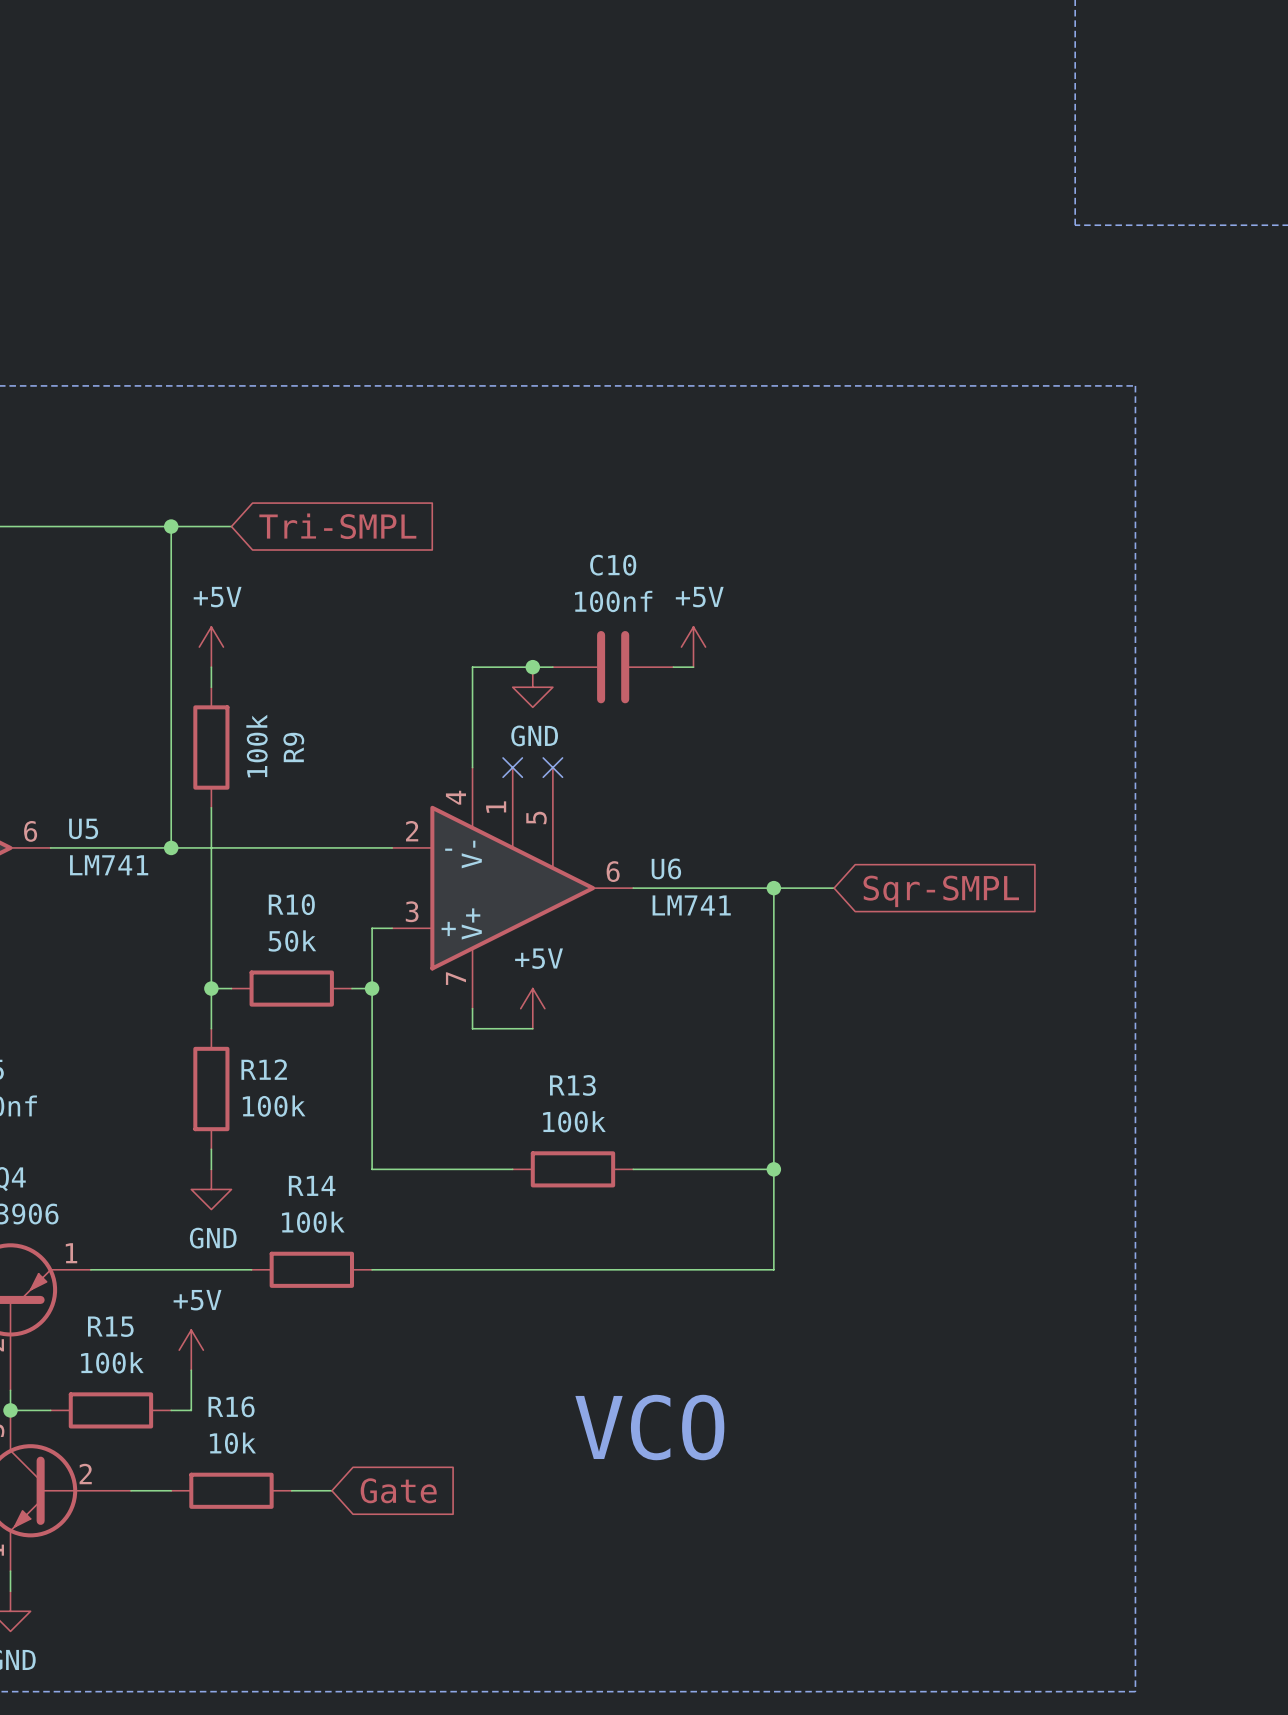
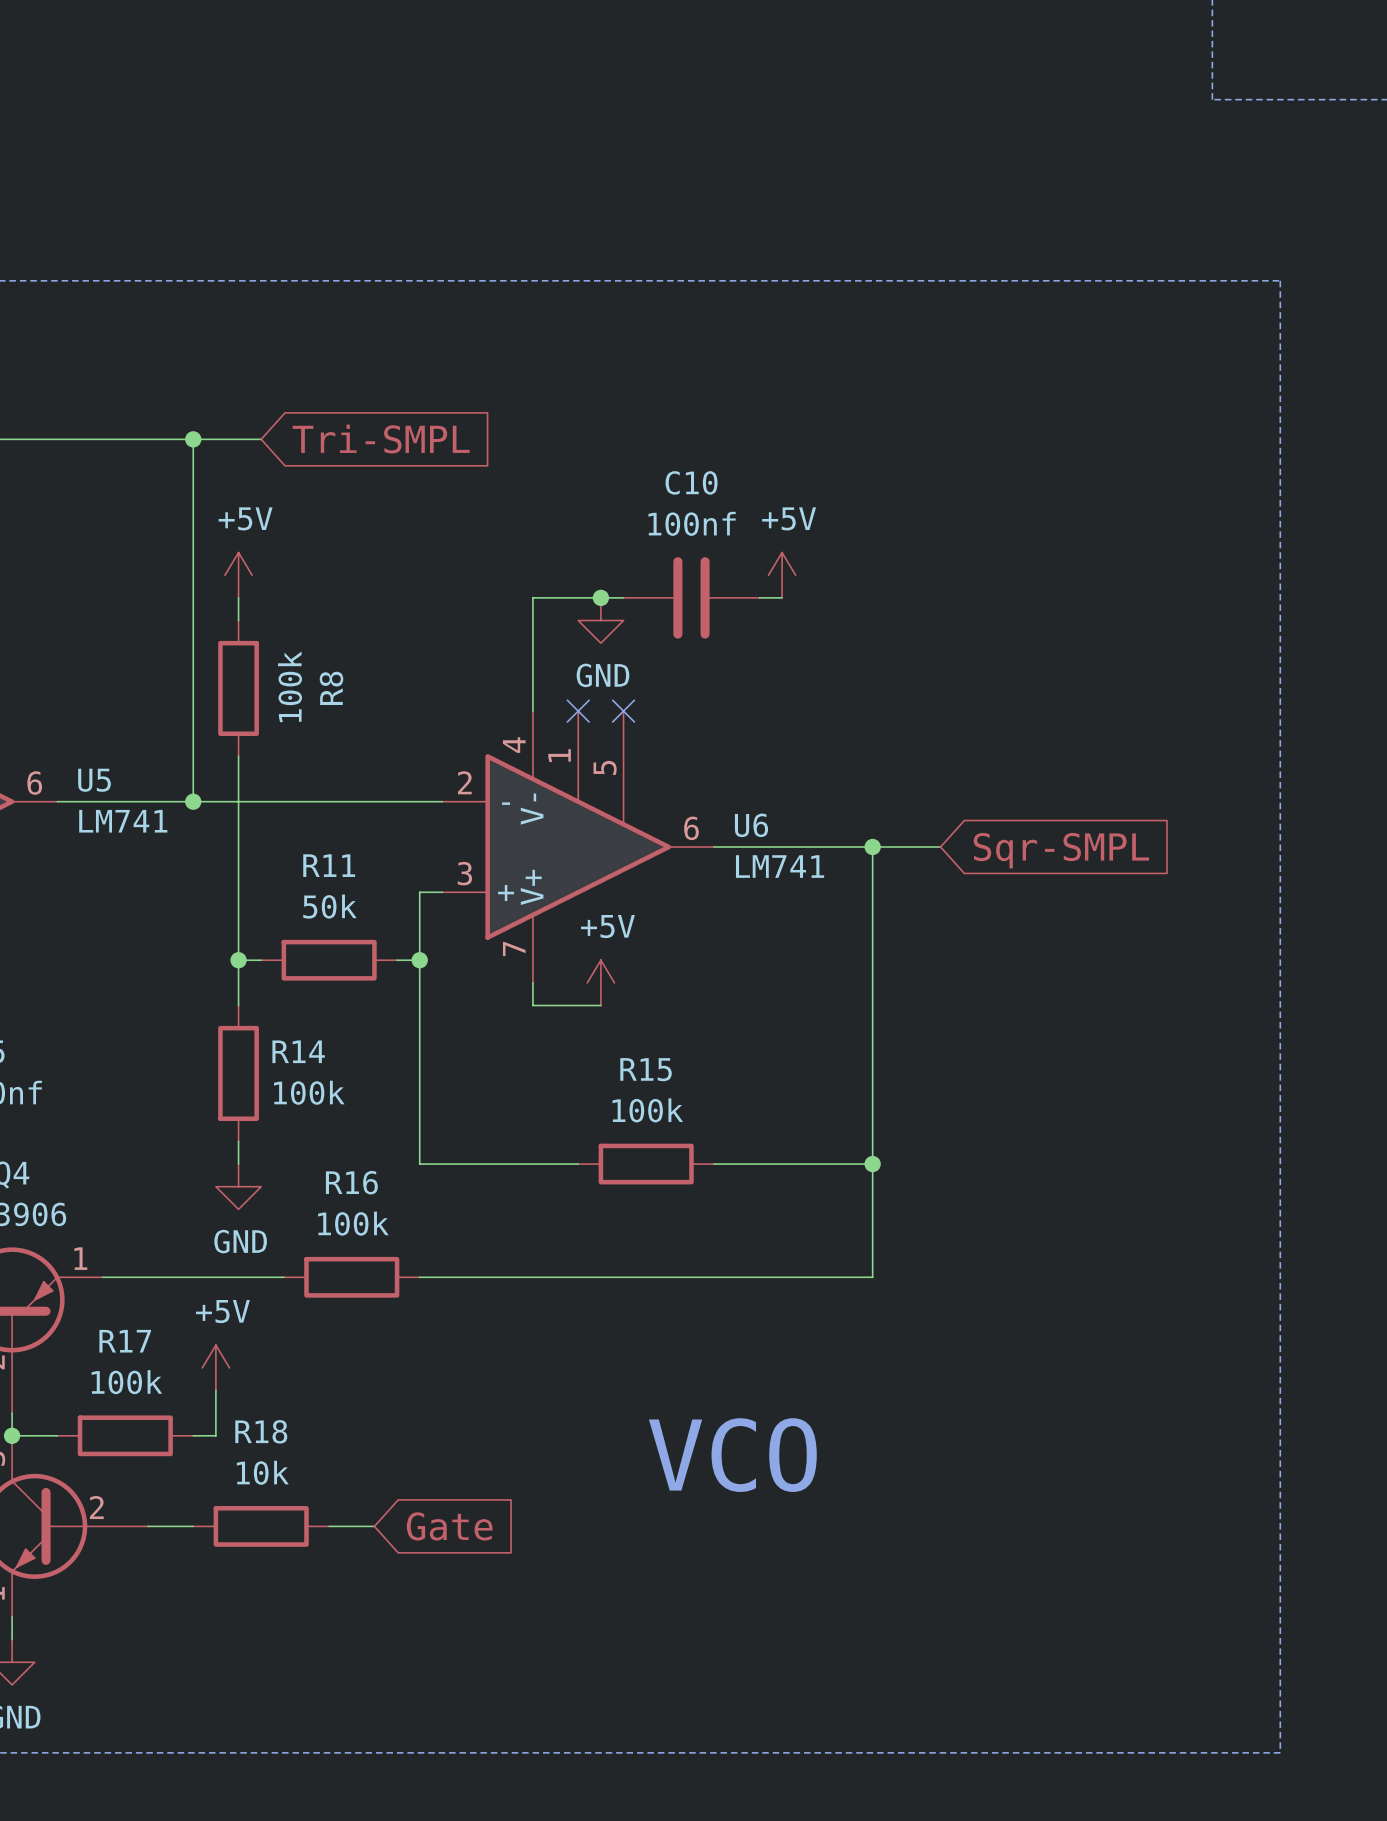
R9 name: R9 (293, 747) -> R8 (331, 688)
R10 name: R10 (291, 904) -> R11 (329, 865)
R12 name: R12 (264, 1069) -> R14 (298, 1051)
R13 name: R13 (572, 1085) -> R15 (646, 1069)
R14 name: R14 (312, 1185) -> R16 (351, 1182)
R15 name: R15 (110, 1326) -> R17 (125, 1341)
R16 name: R16 (231, 1406) -> R18 (261, 1431)

